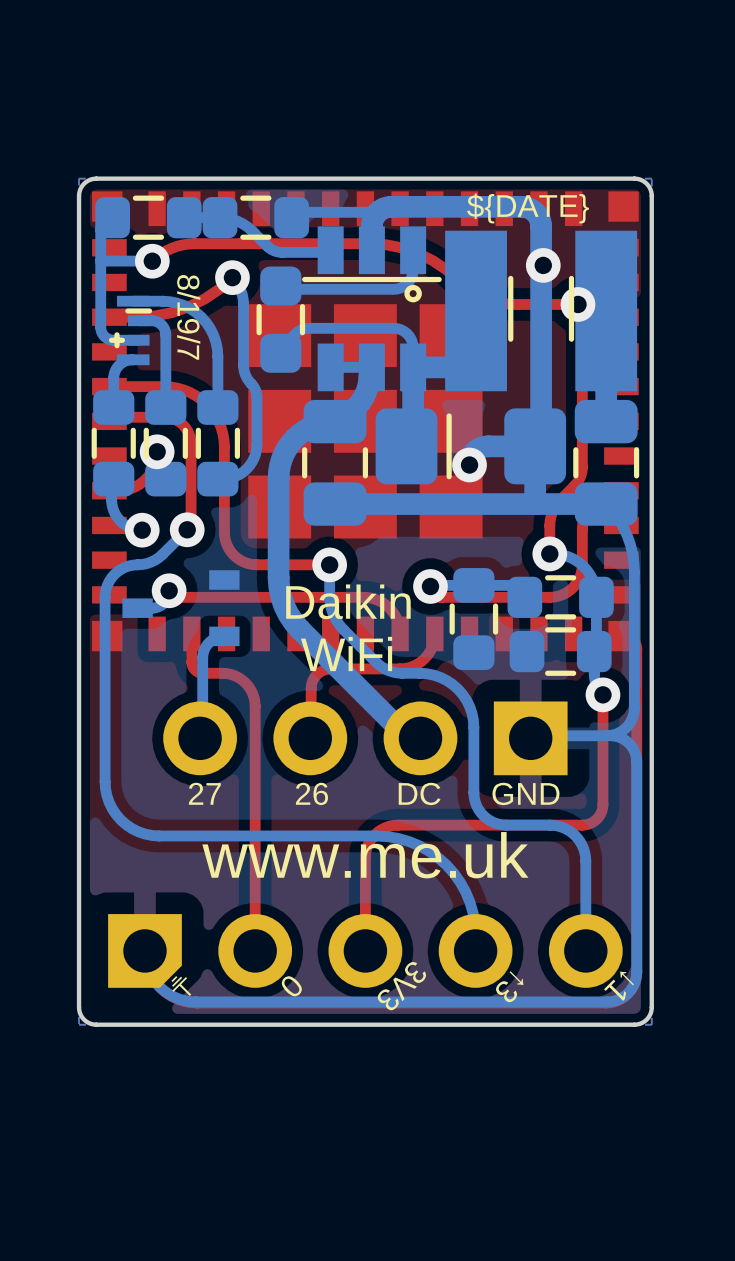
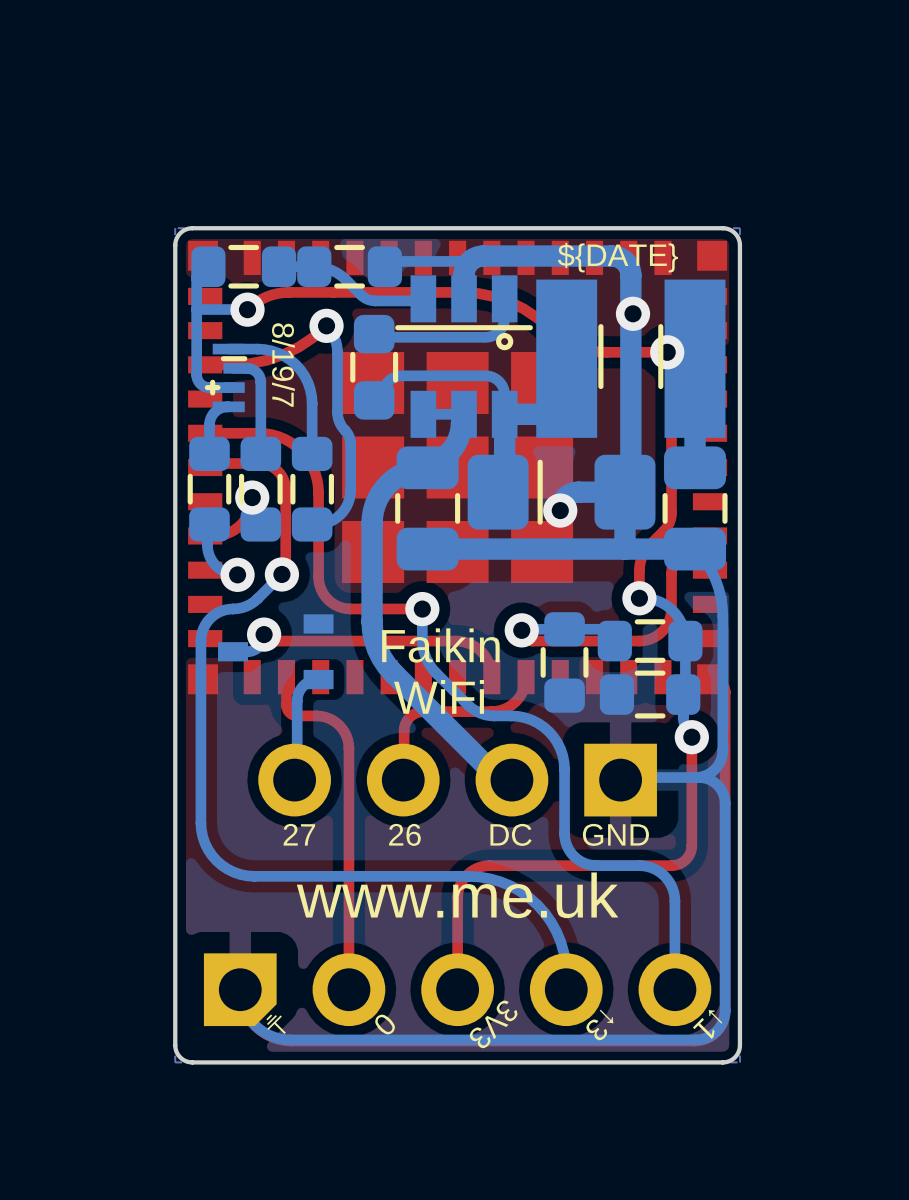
text: Daikin (348, 601) -> Faikin (440, 645)

